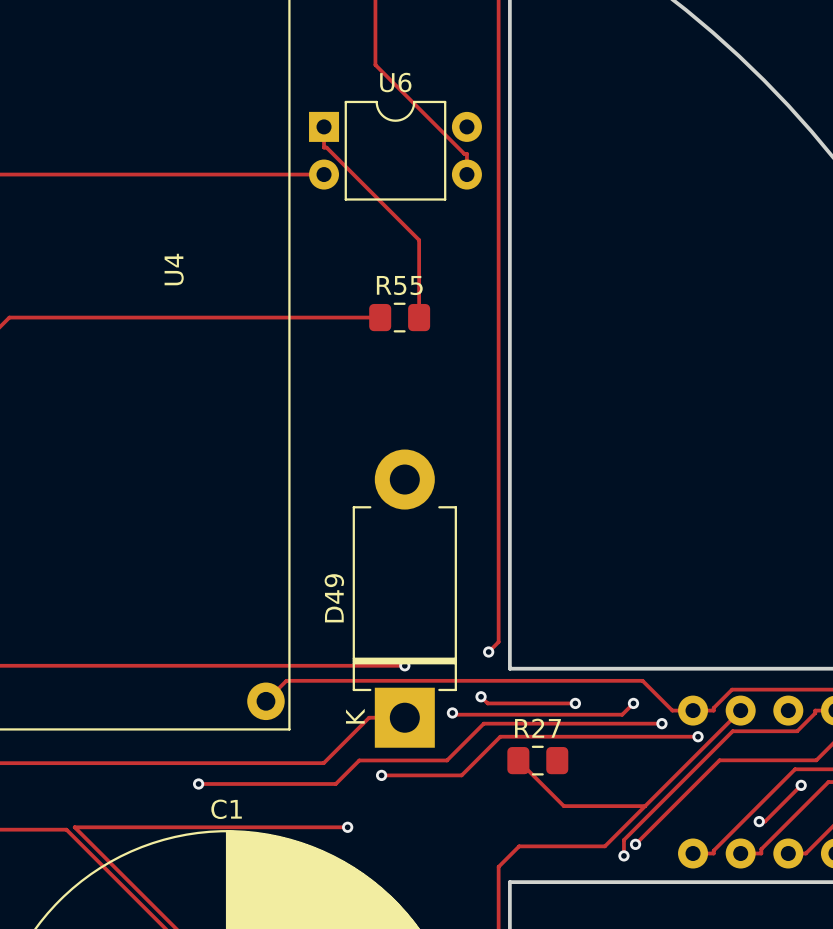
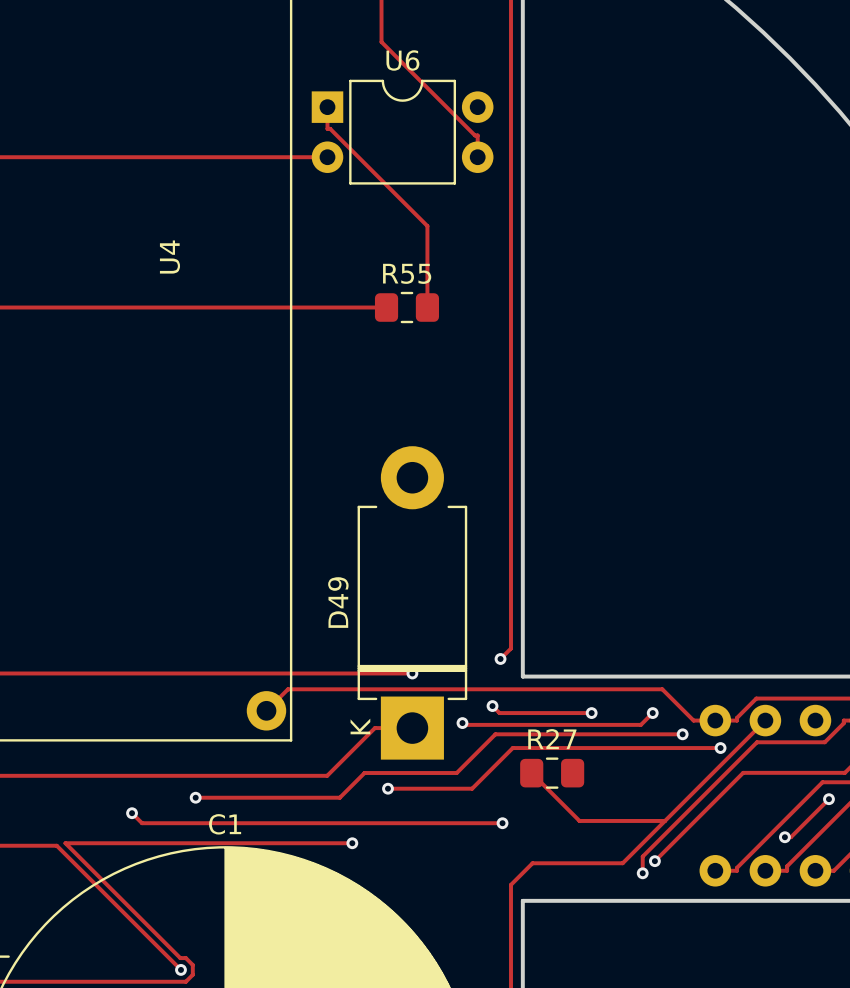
track: none -> (132, 813) (142, 823) (502, 823)
via: none -> (132, 813)
via: none -> (502, 823)

